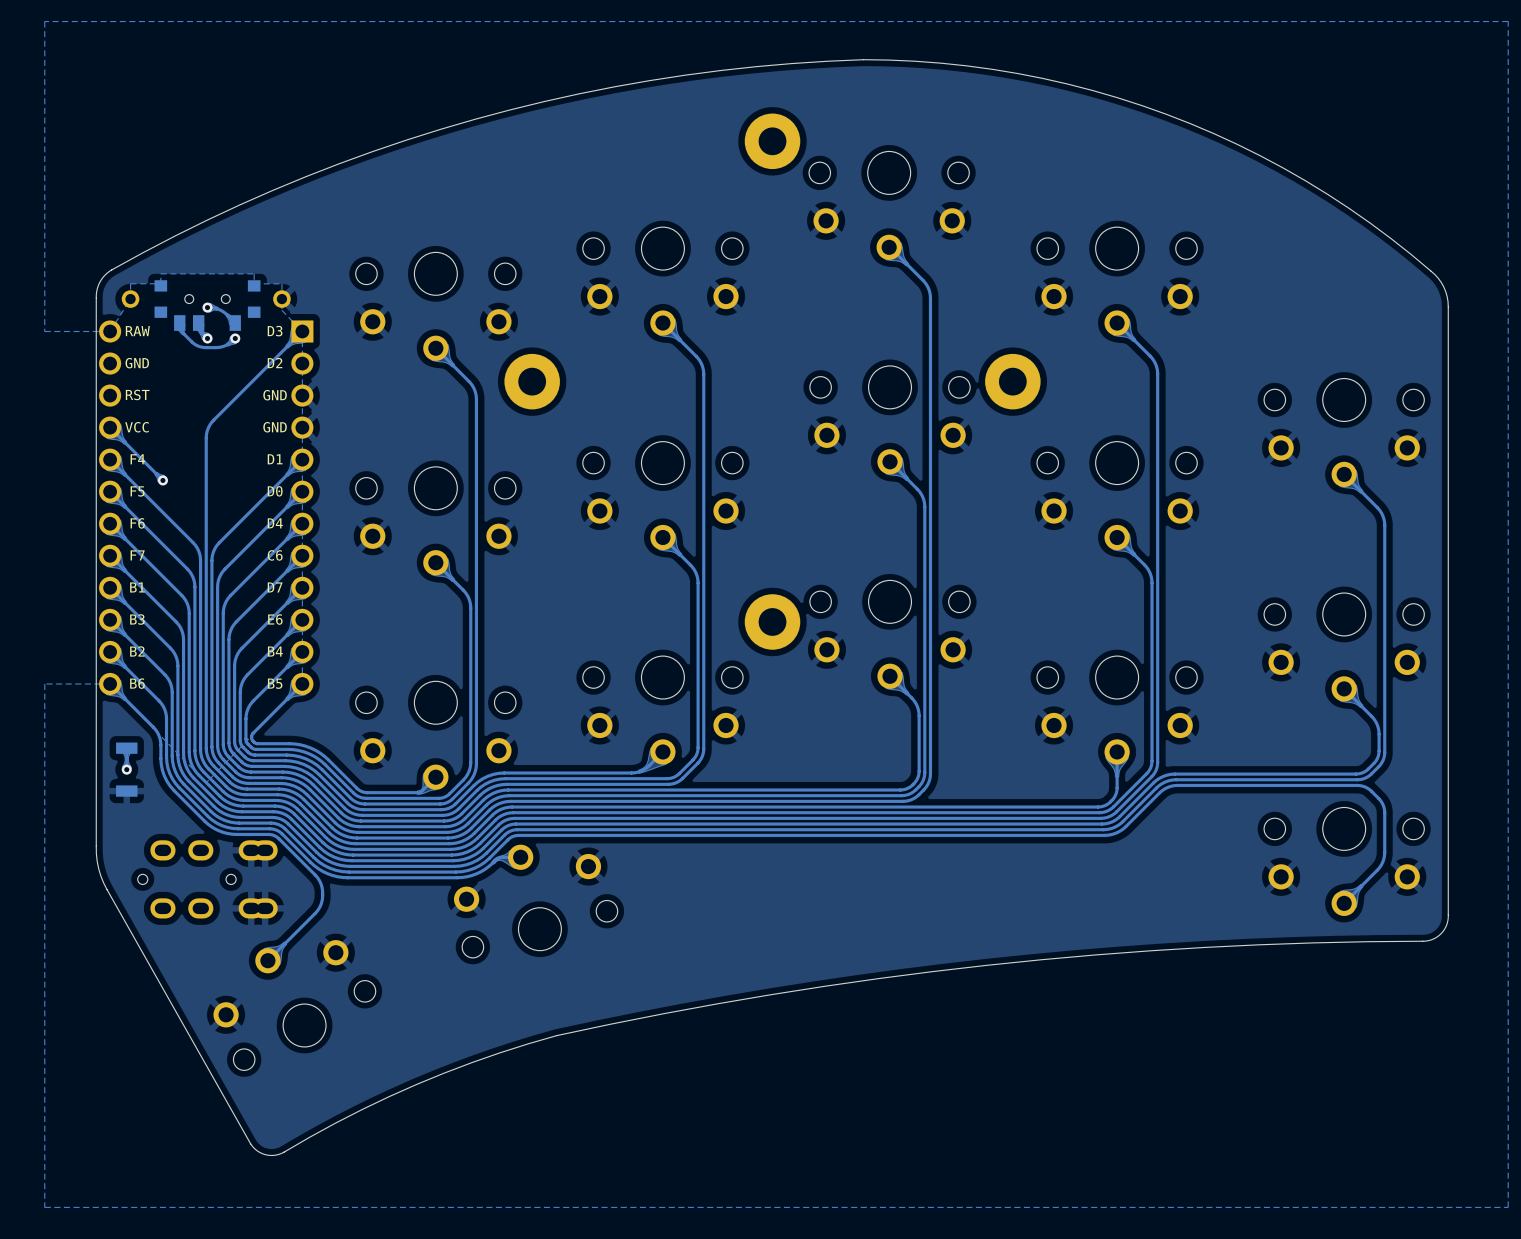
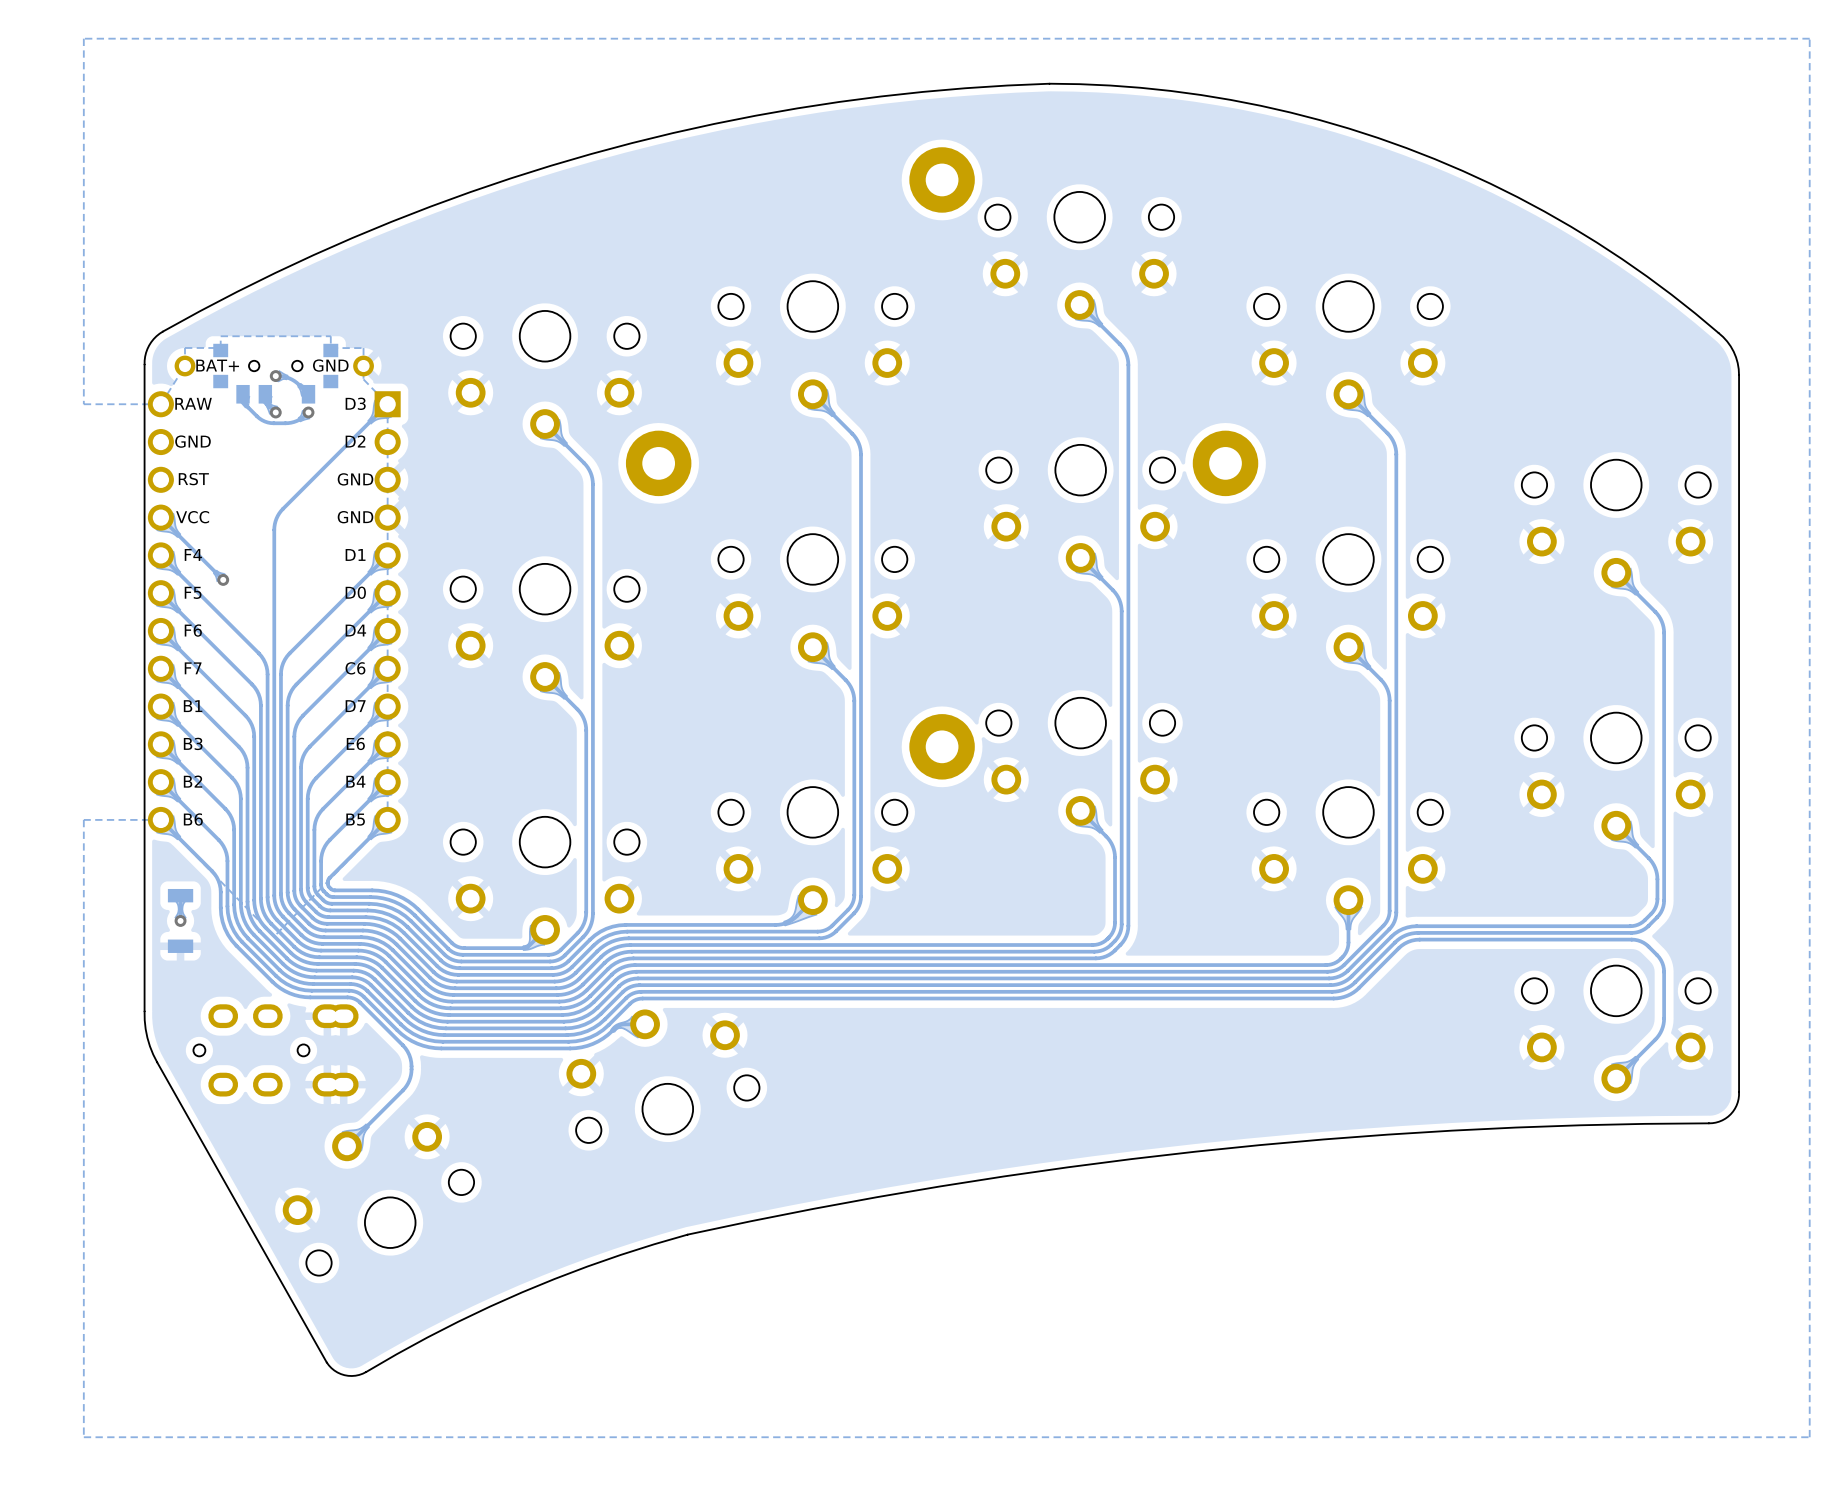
text: none -> BAT+ (217, 365)
text: none -> GND (330, 365)

